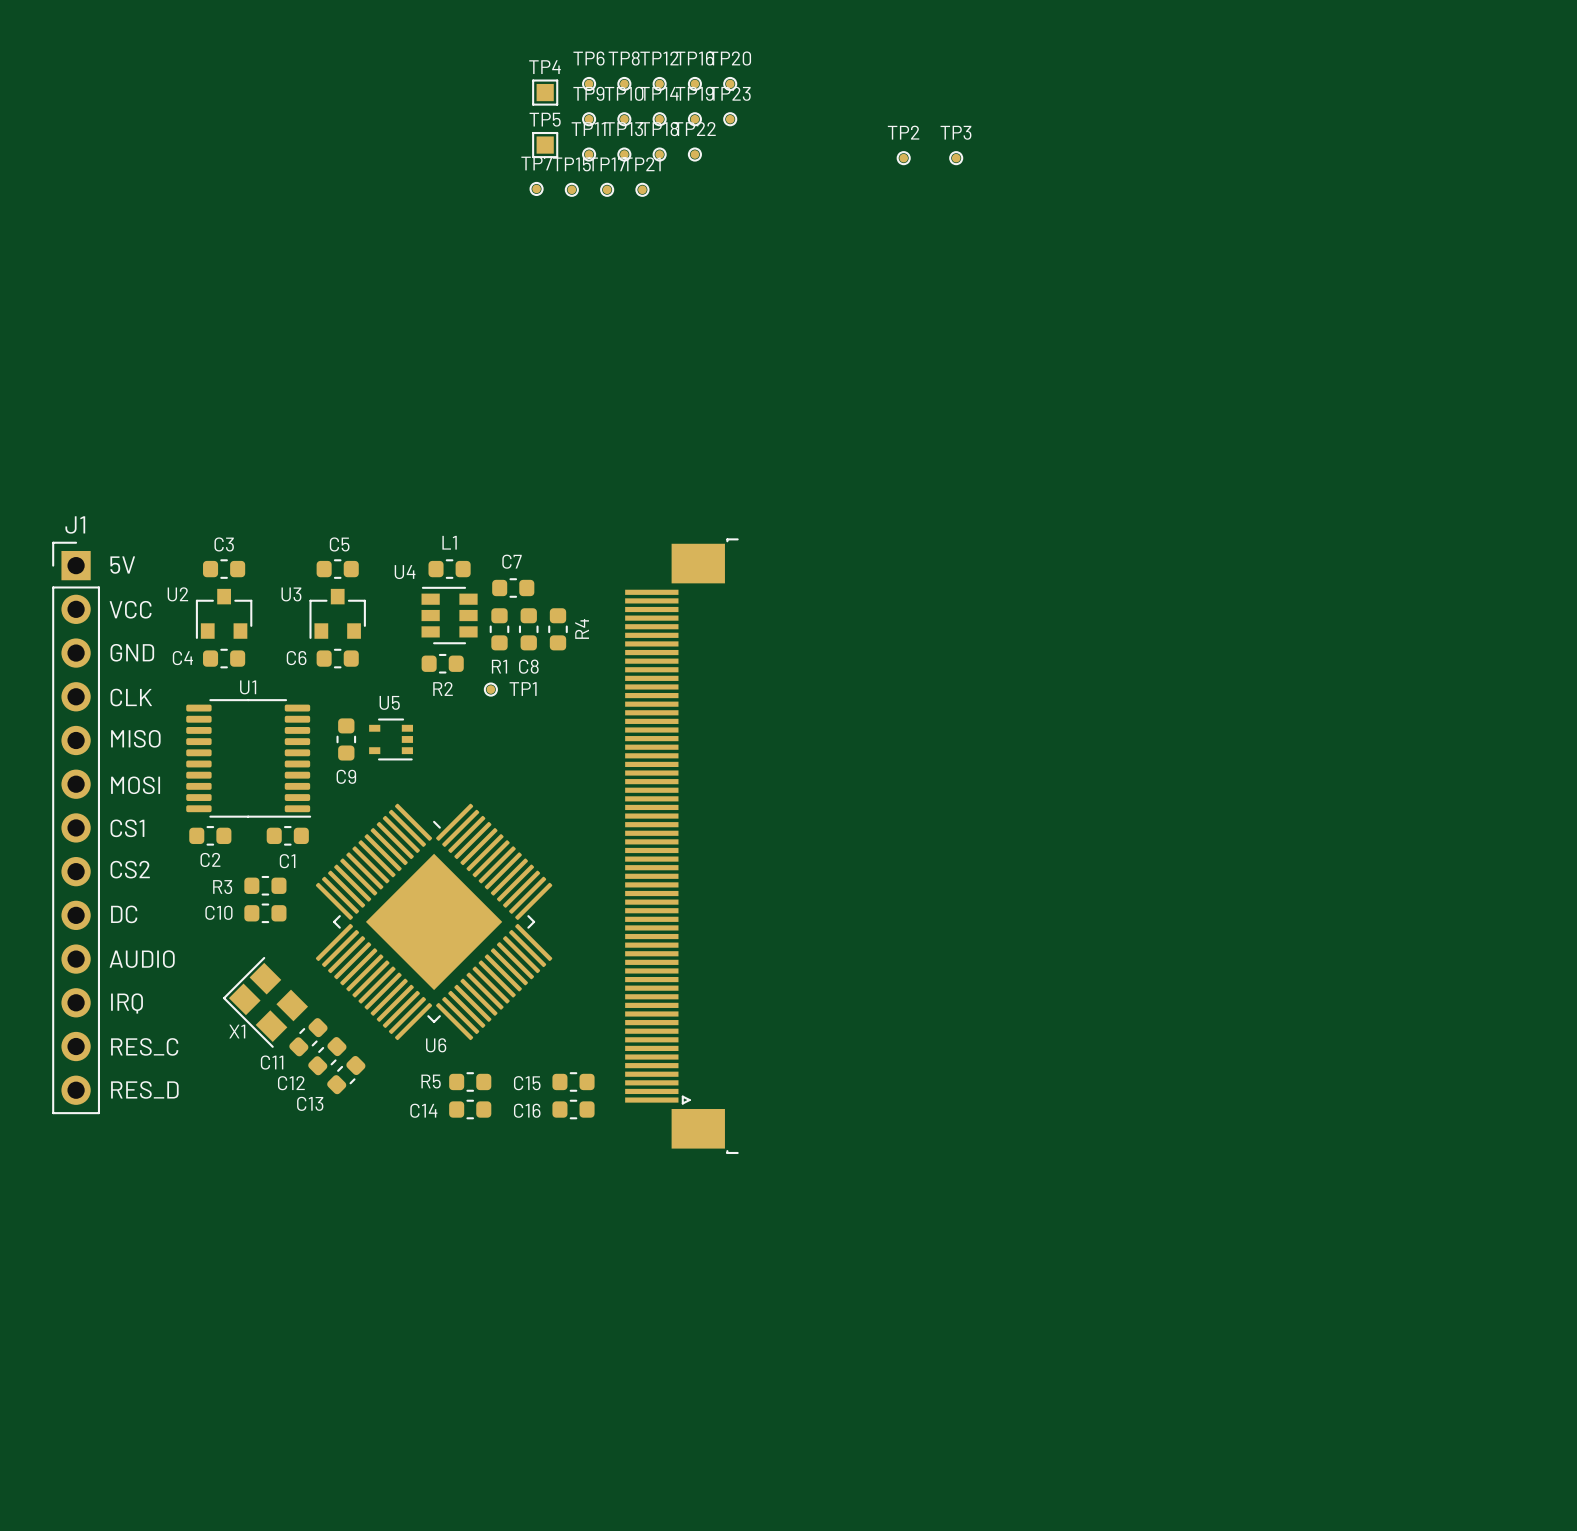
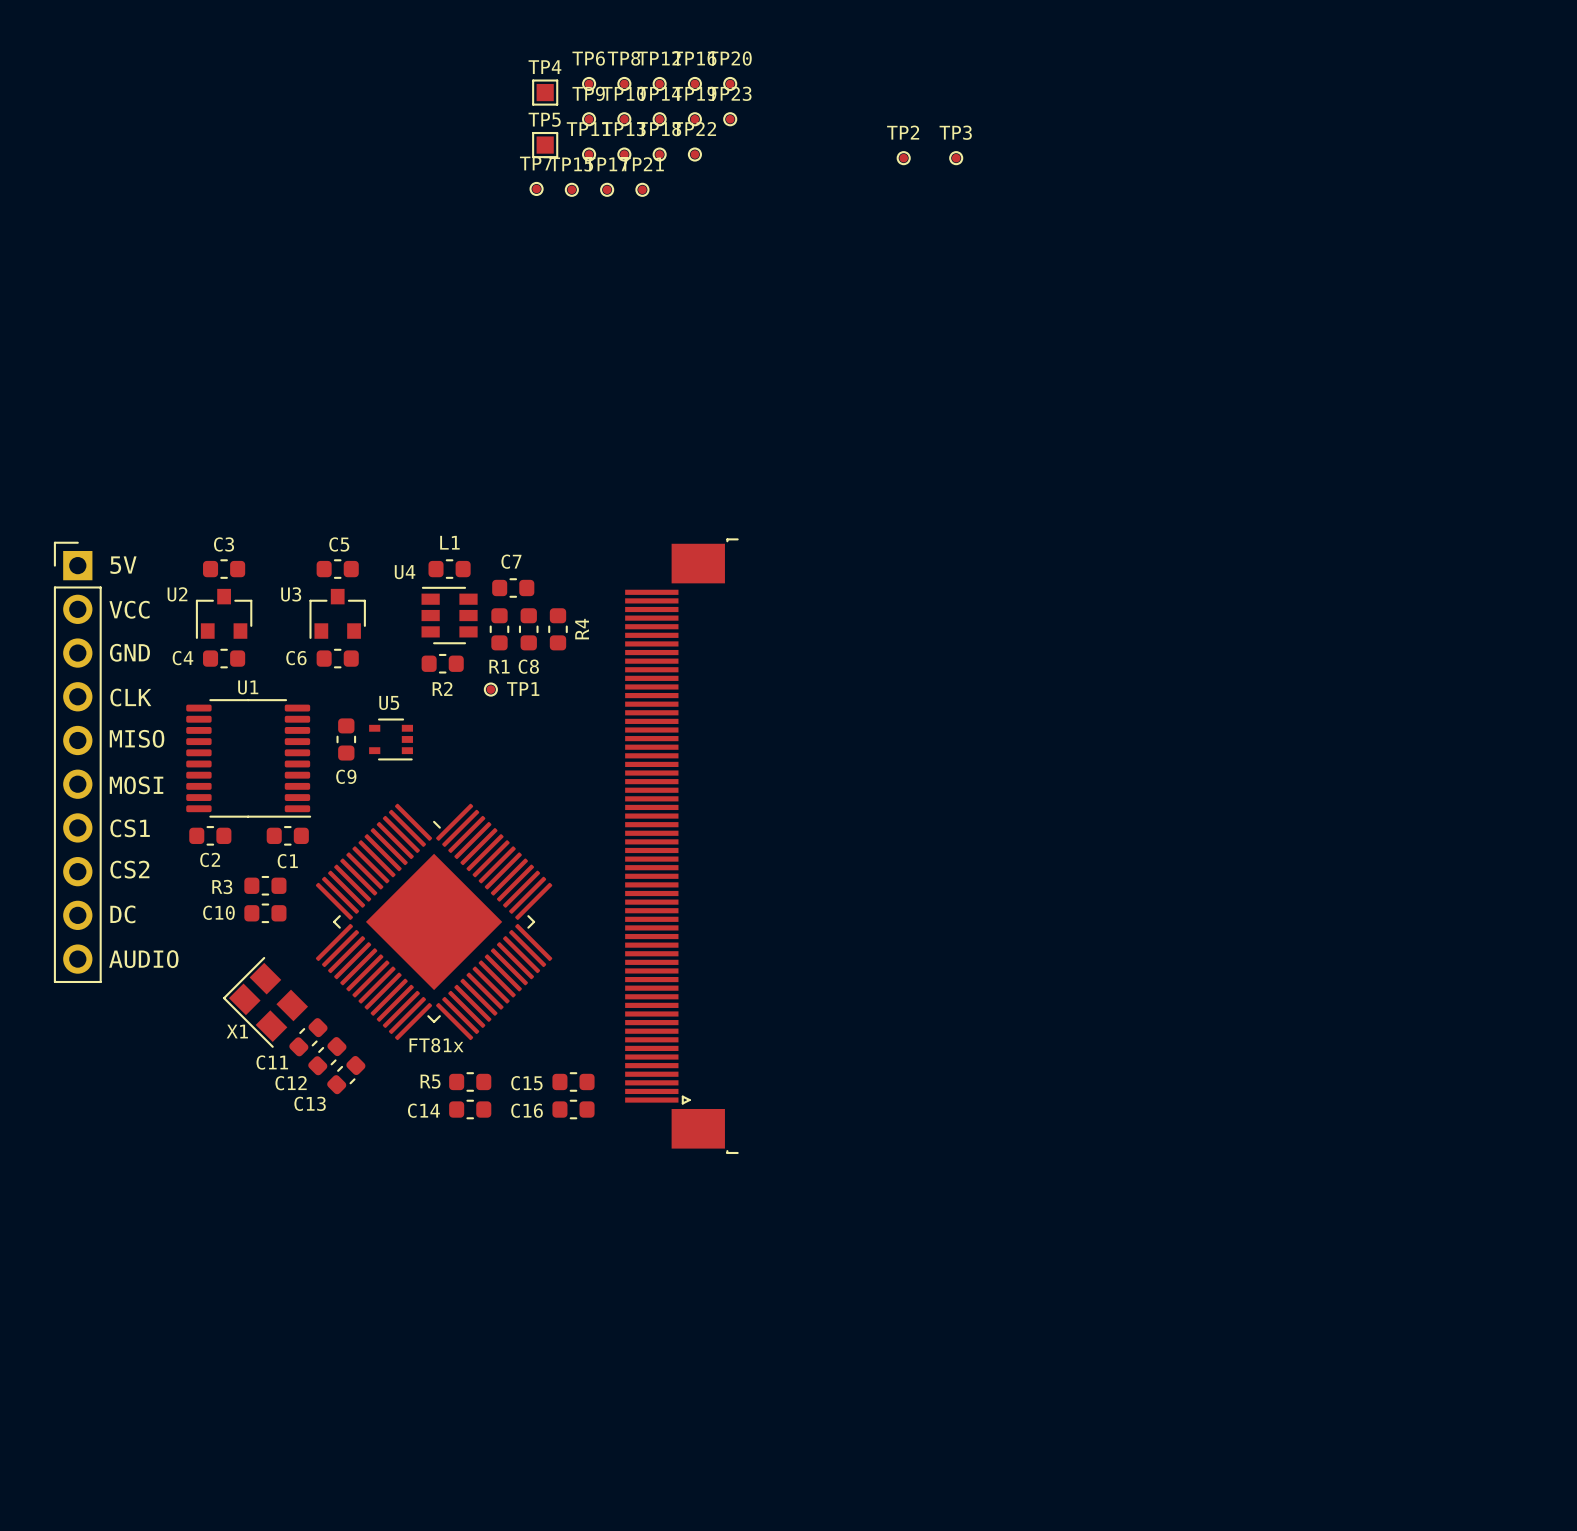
part: none -> (77, 762)
J1: (76, 827) -> none
text: IRQ (127, 1003) -> none
U6 name: U6 (436, 1045) -> FT81x (436, 1045)
text: RES_C (144, 1046) -> none
text: RES_D (144, 1089) -> none

